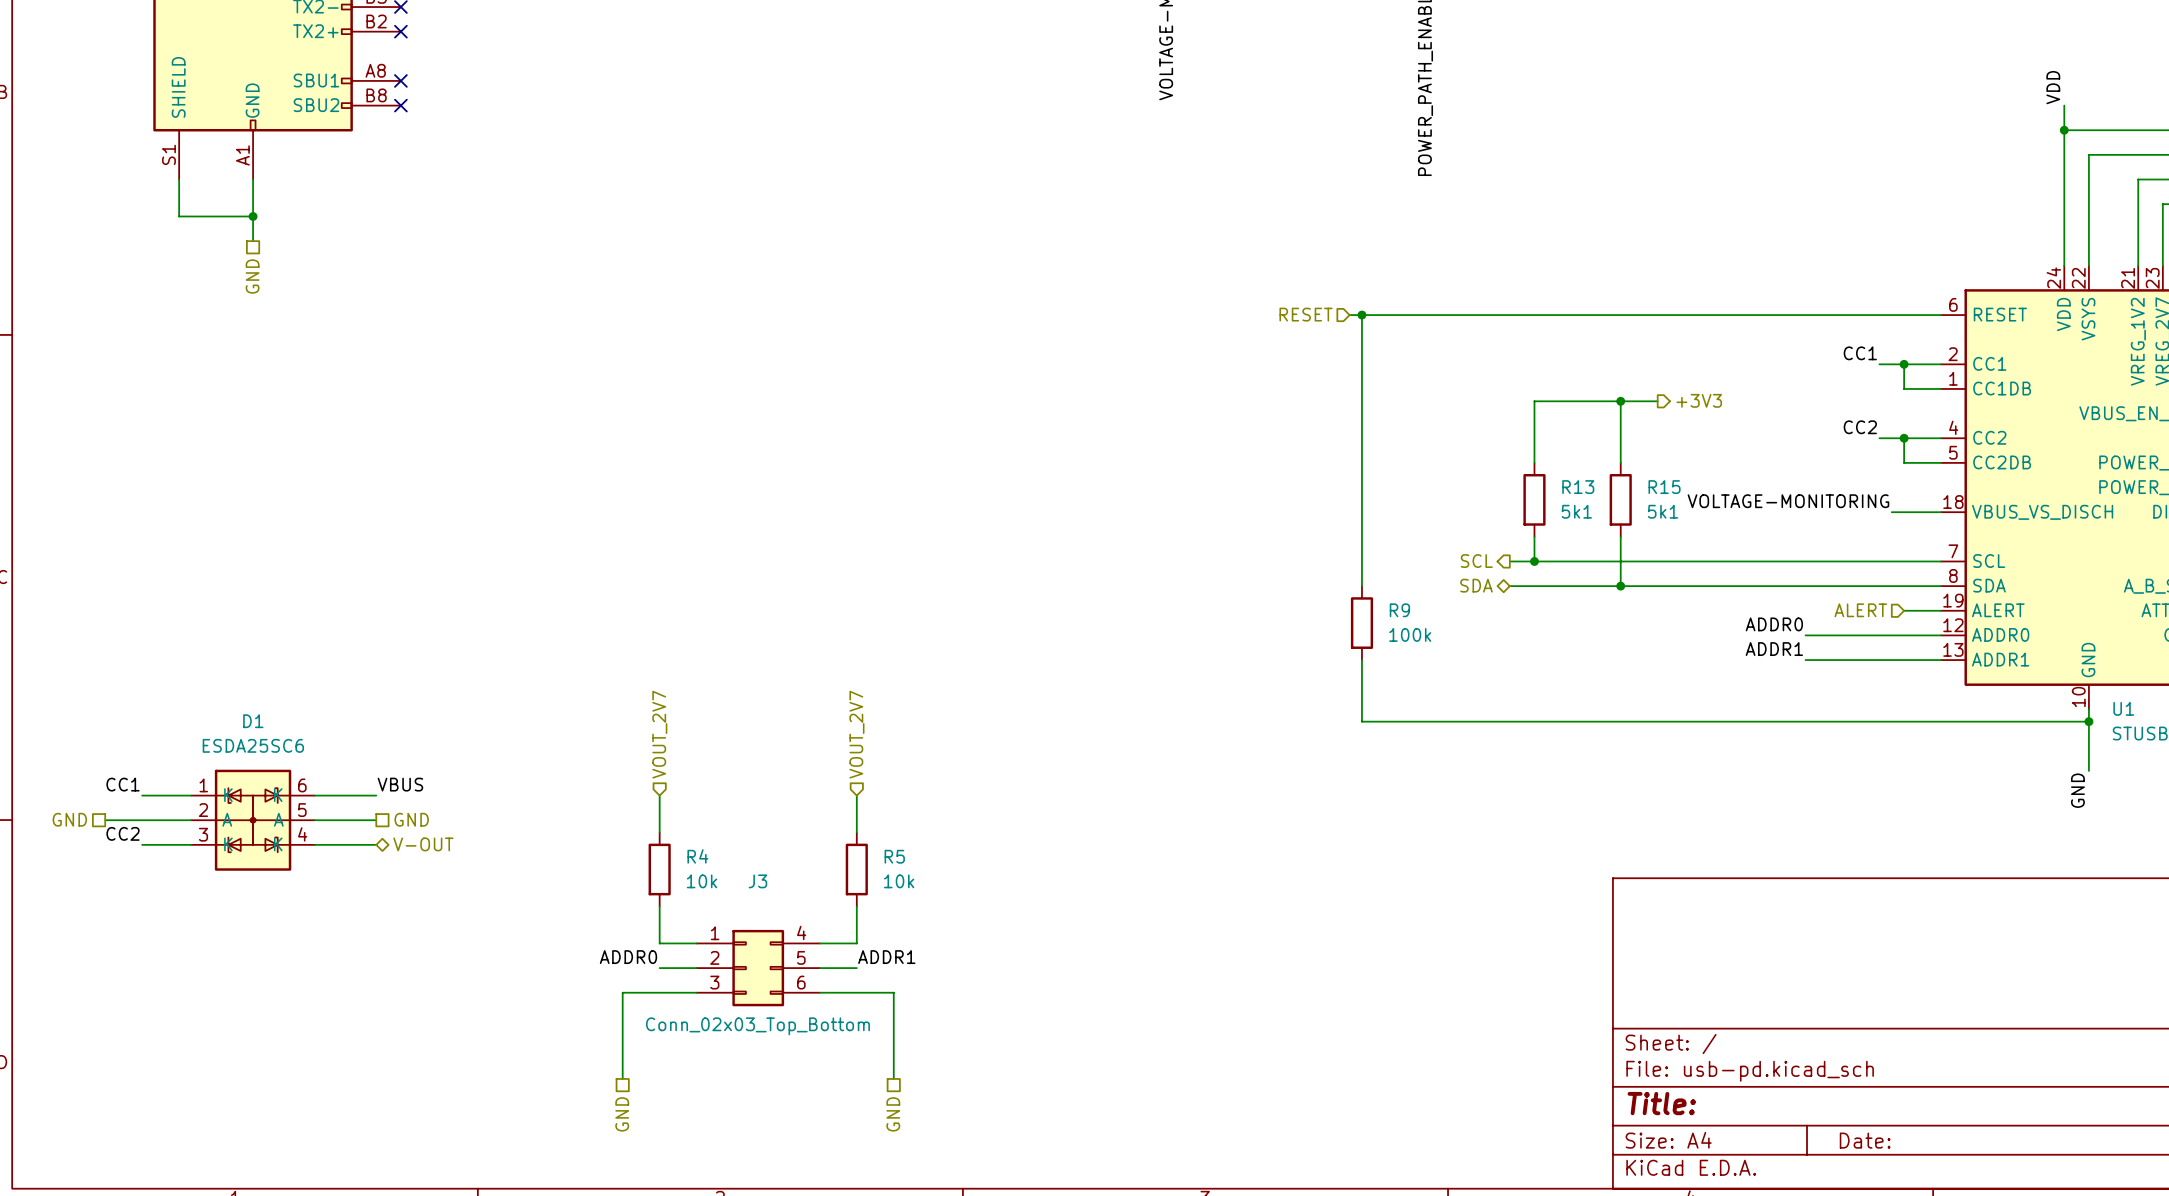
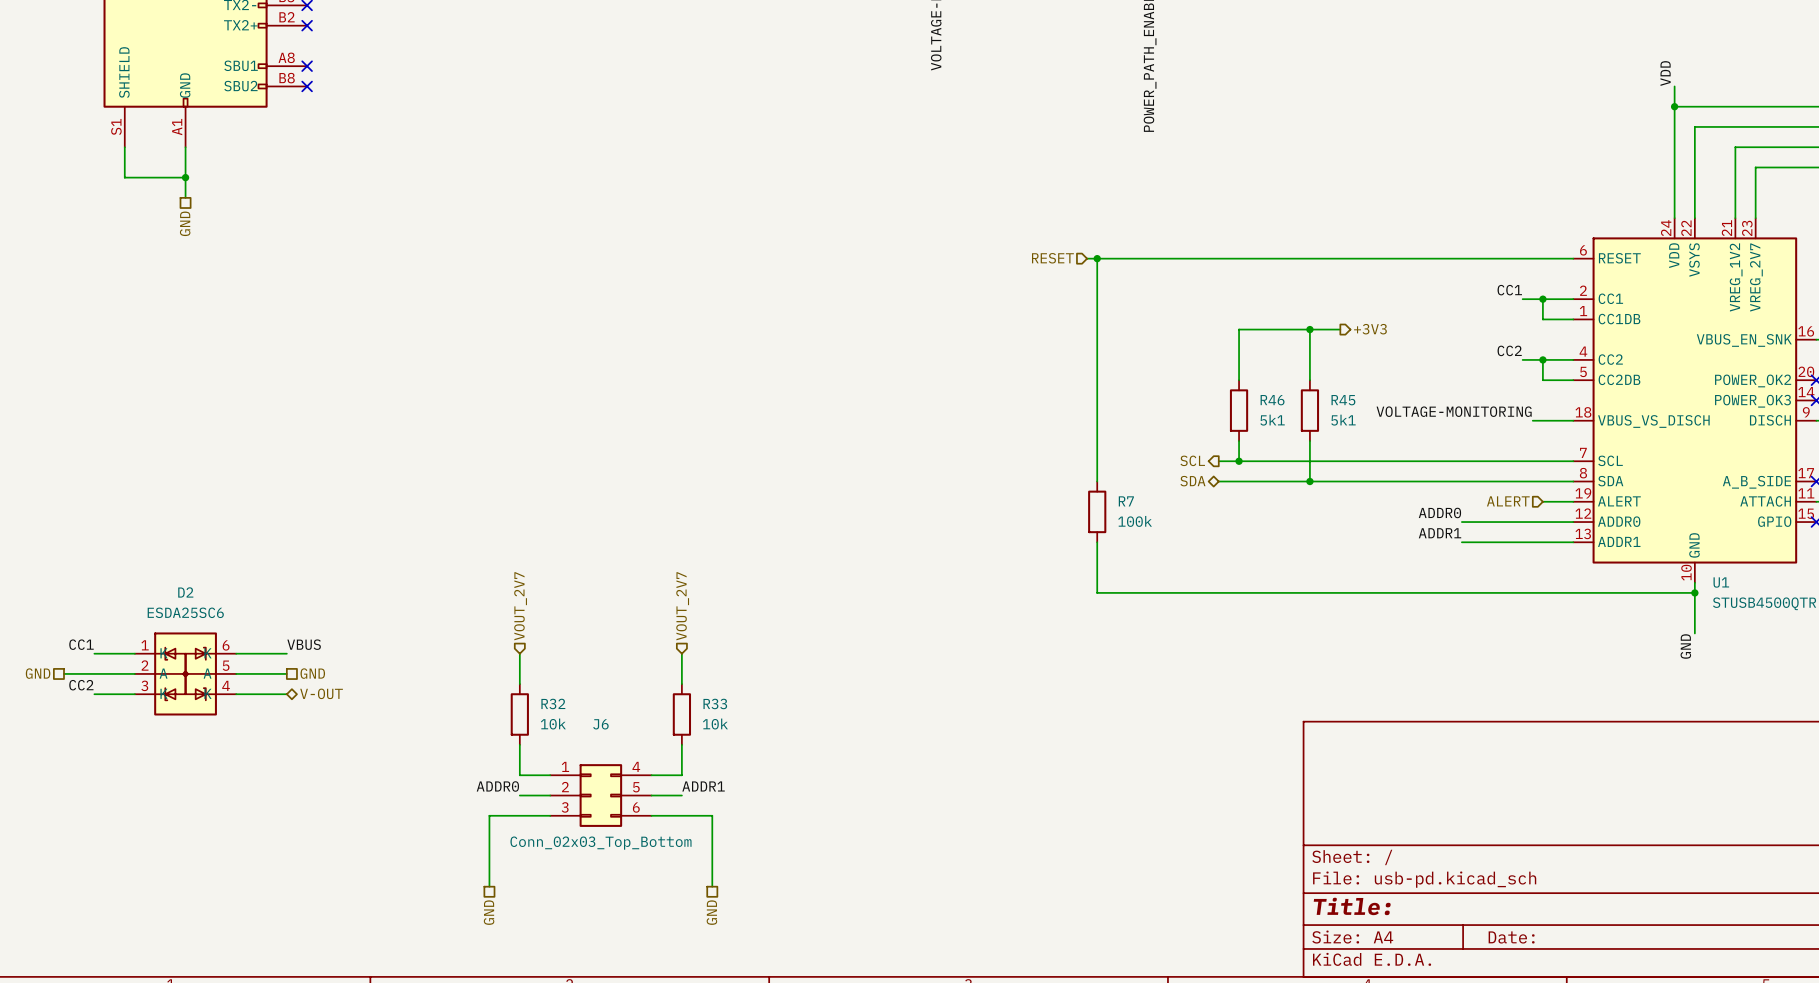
R13 name: R13 (1578, 487) -> R46 (1272, 400)
R15 name: R15 (1664, 487) -> R45 (1343, 400)
R9 name: R9 (1399, 610) -> R7 (1126, 501)
D1 name: D1 (253, 721) -> D2 (185, 592)
R4 name: R4 (697, 856) -> R32 (553, 703)
R5 name: R5 (894, 856) -> R33 (715, 703)
J3 name: J3 (757, 881) -> J6 (600, 724)

